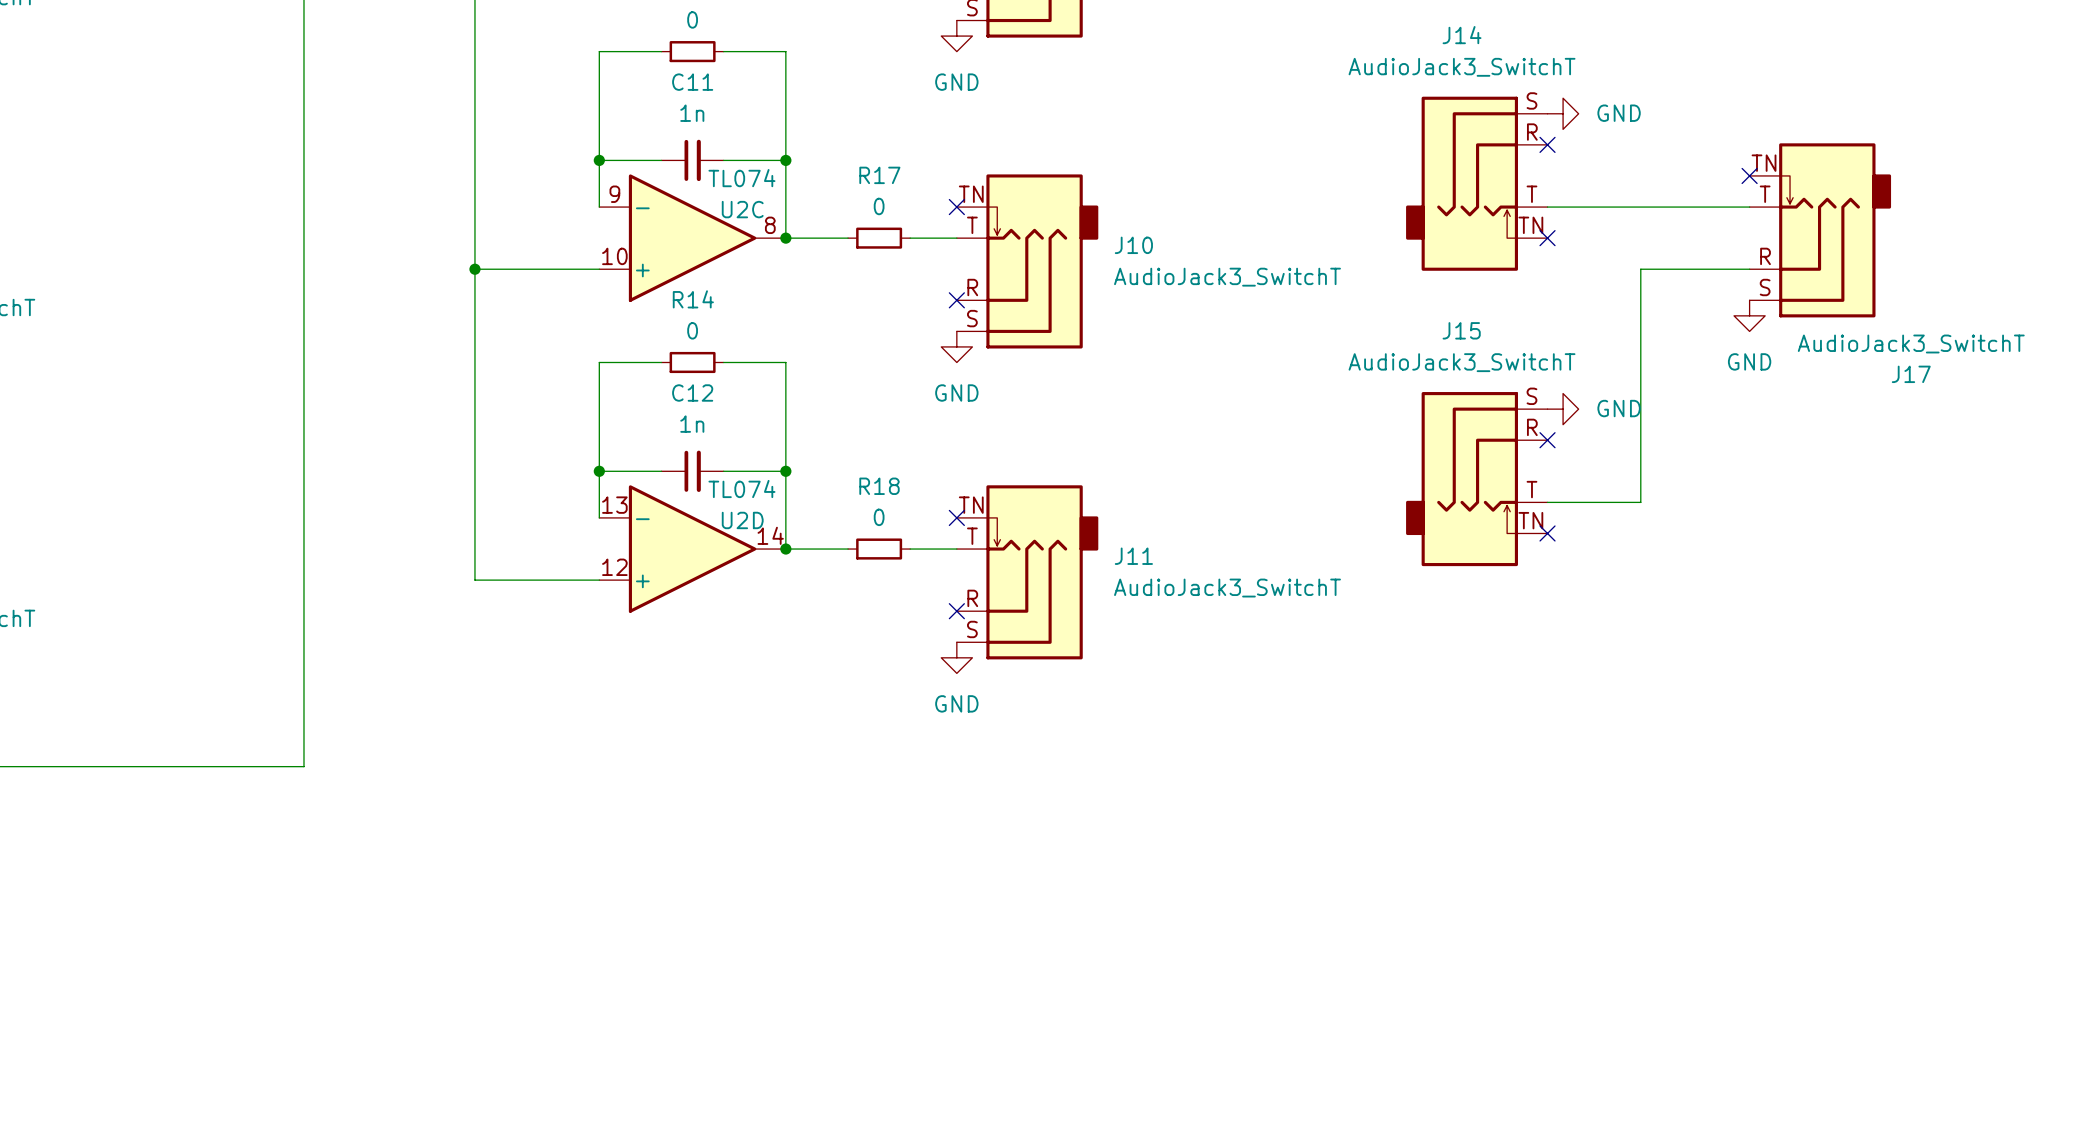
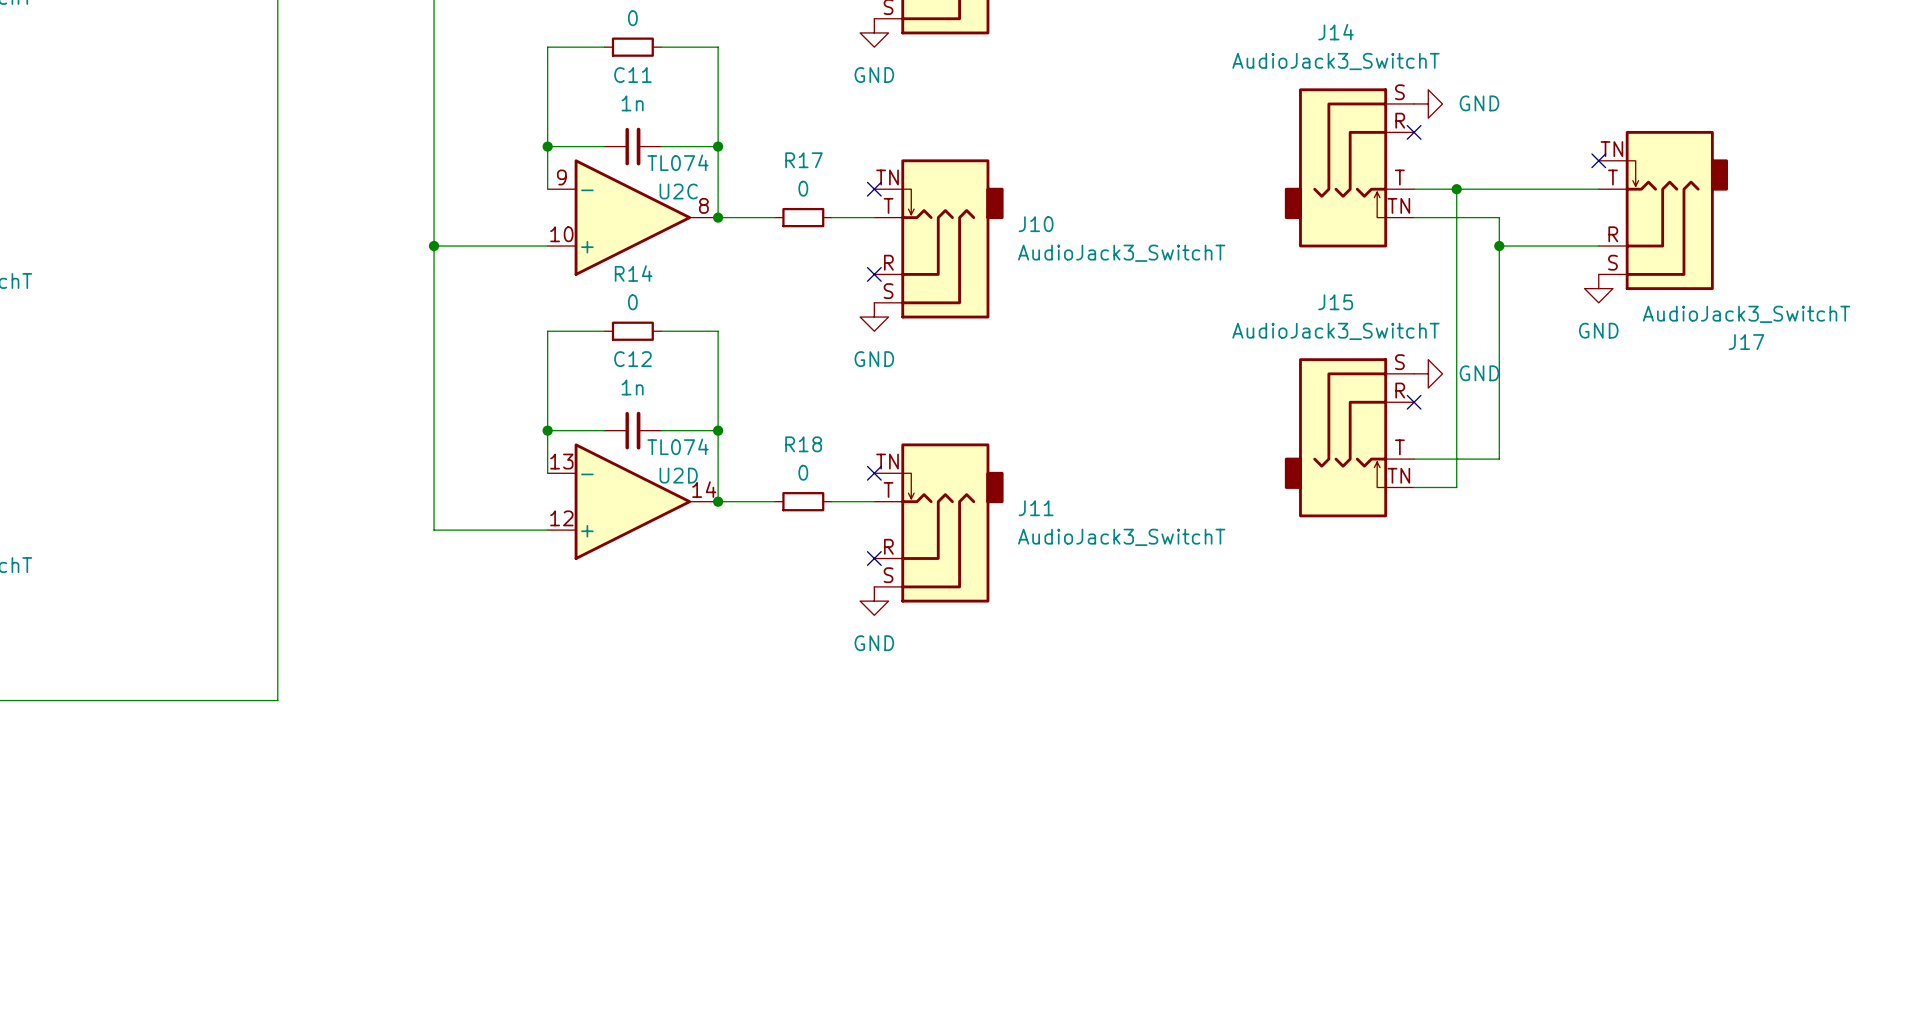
wire: none -> (1456, 189) (1456, 487) (1414, 487)
junction: none -> (1456, 189)
wire: none -> (1414, 217) (1499, 217) (1499, 246)
no-connect mark: (1547, 238) -> none
junction: none -> (1499, 246)
no-connect mark: (1547, 533) -> none

